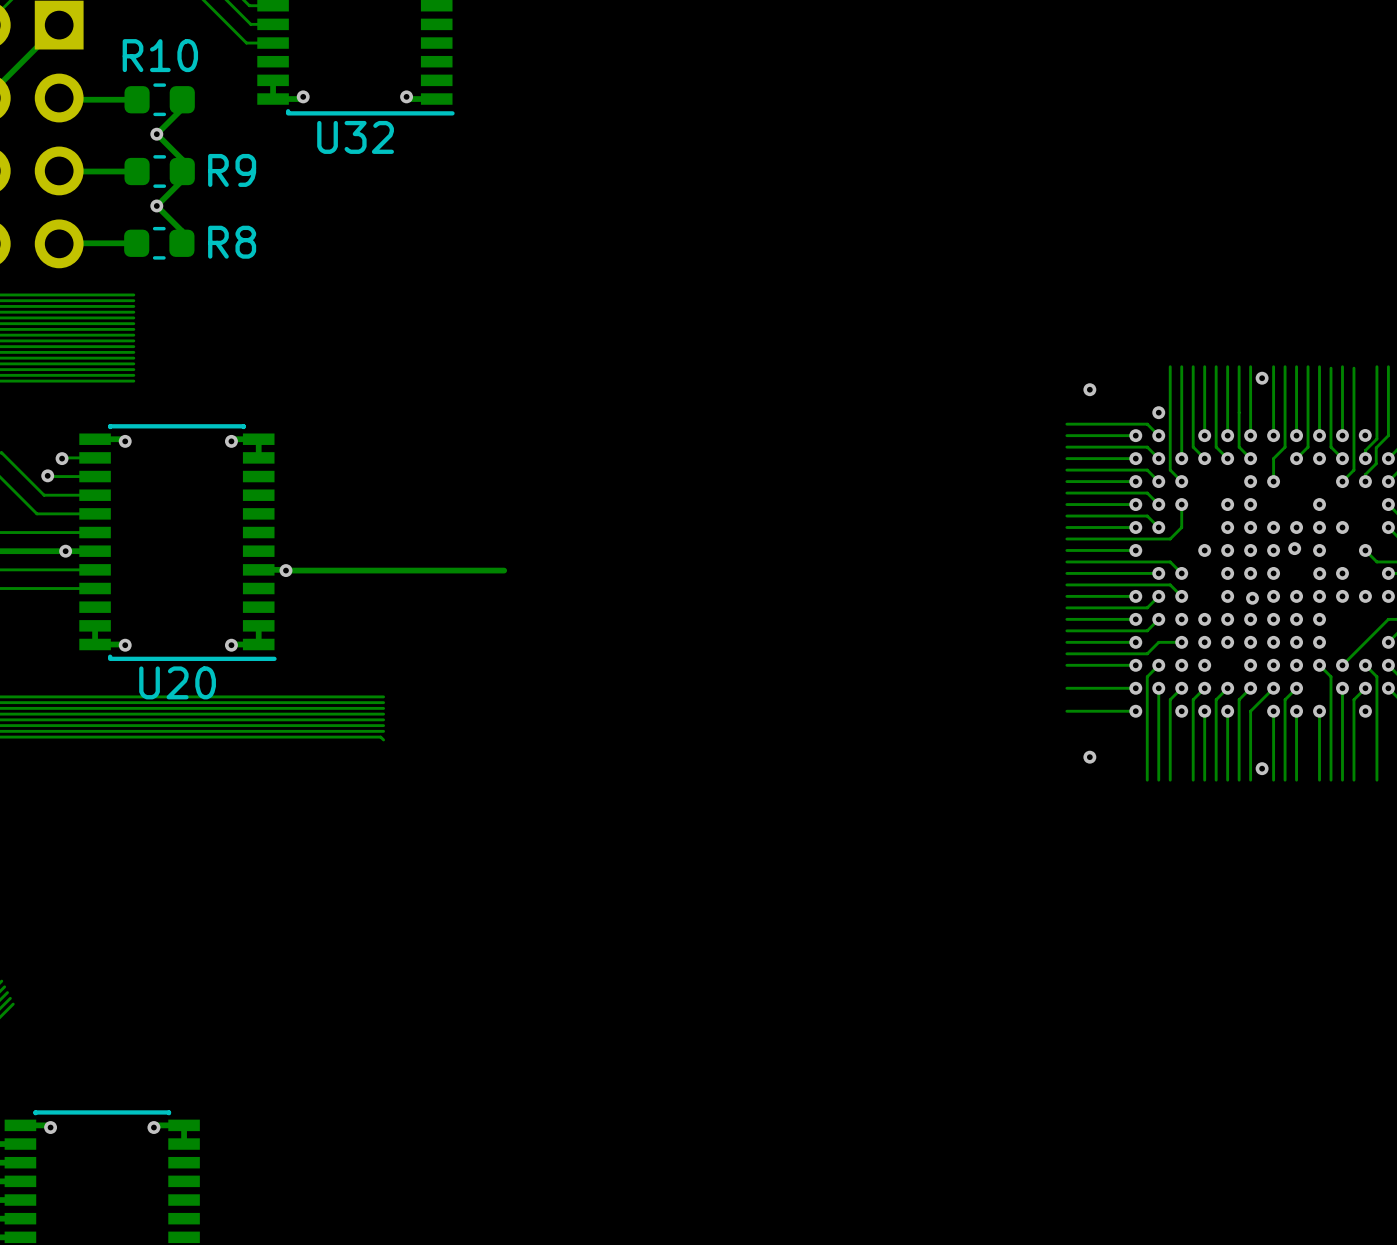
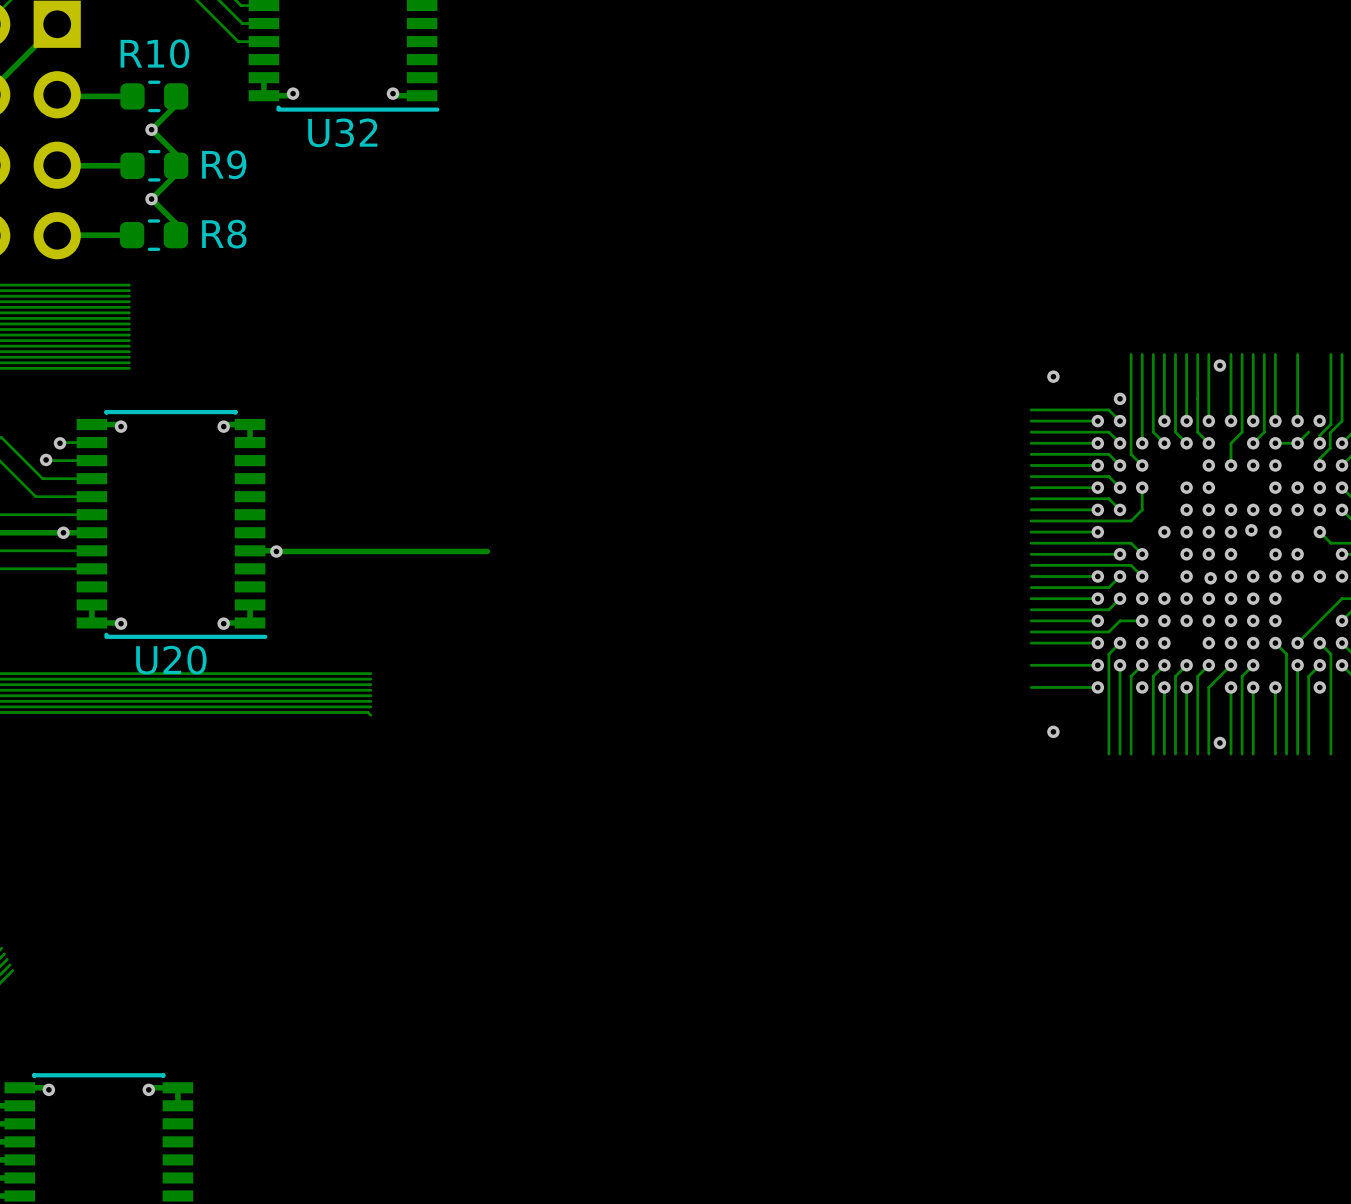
track: (1331, 368) (1331, 447) (1342, 458) -> none
track: (1353, 368) (1353, 470) (1342, 481) -> none
track: none -> (1308, 432) (1297, 443) (1275, 443)
via: none -> (1253, 465)
via: none -> (1275, 465)
via: (1342, 481) -> none
via: none -> (1297, 487)
via: none -> (1319, 487)
via: none -> (1319, 509)

